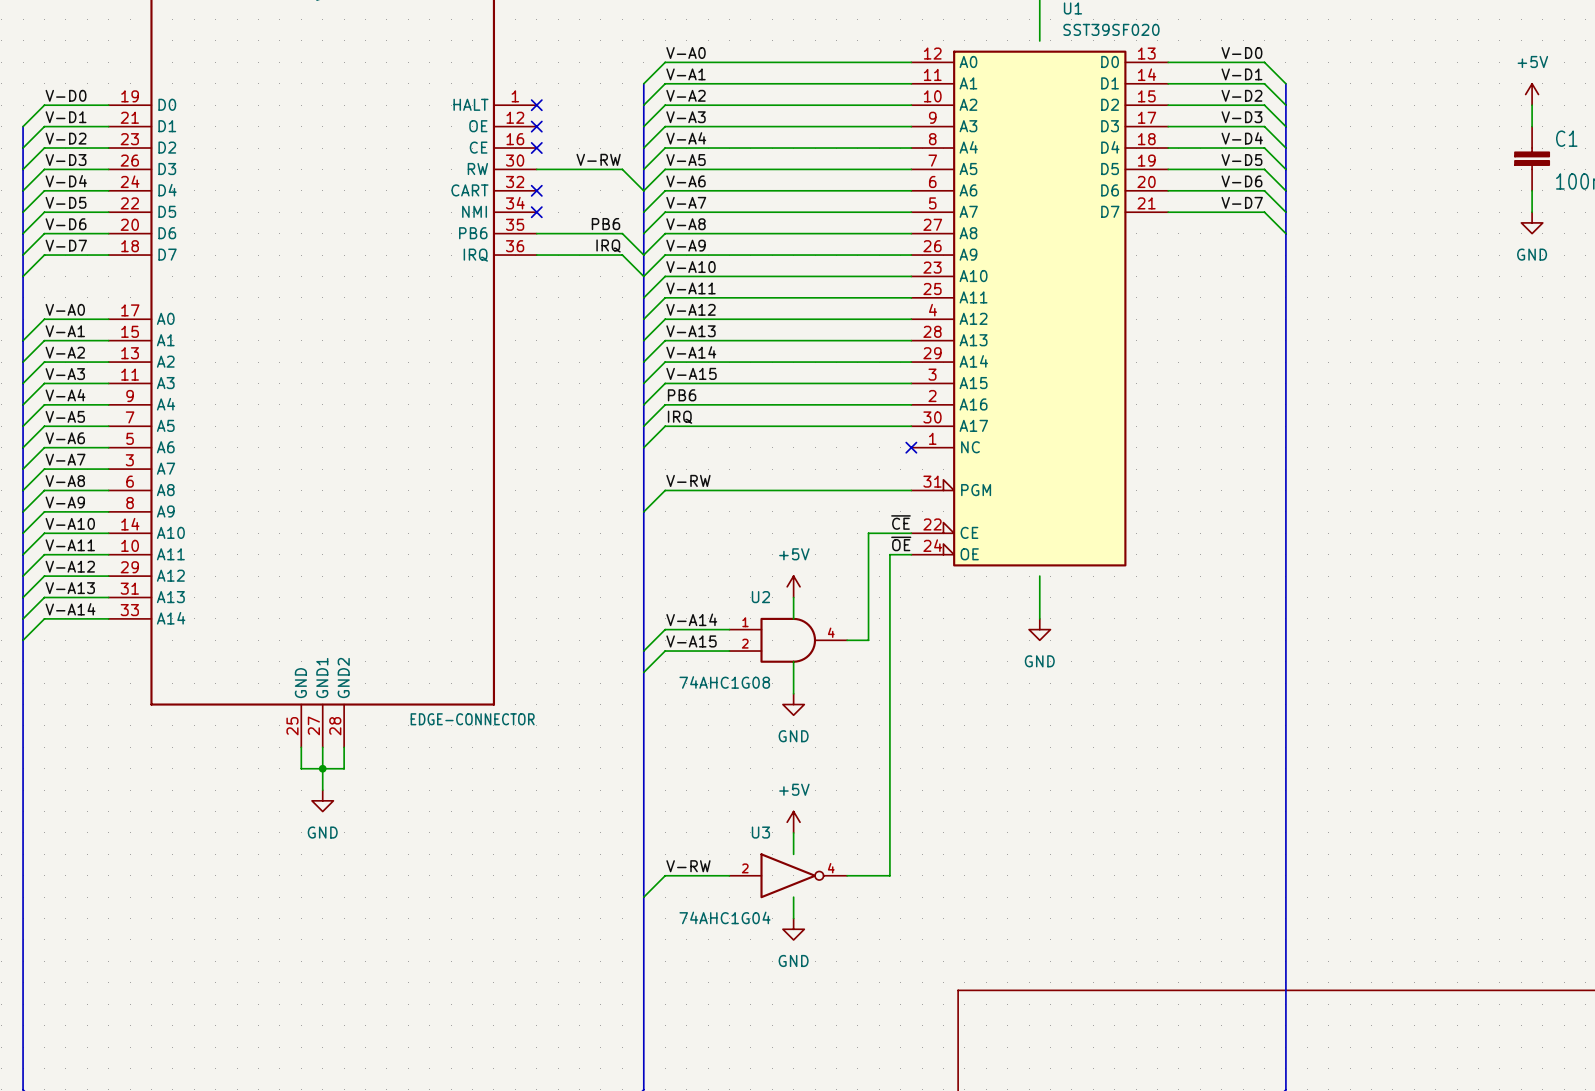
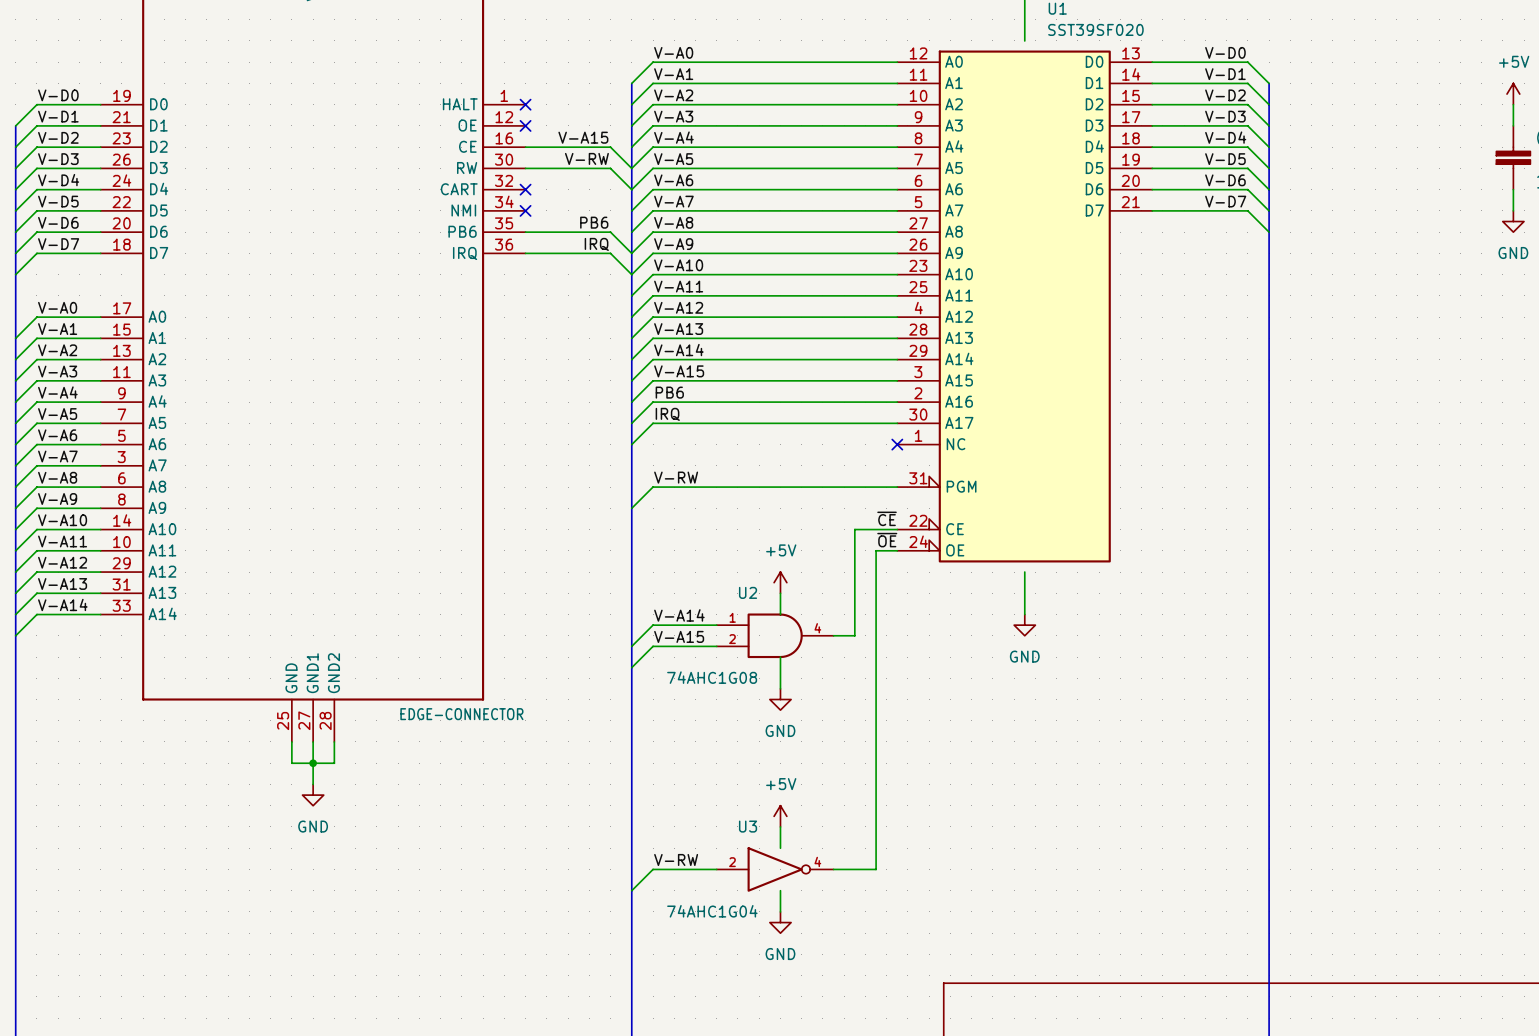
label: none -> V-A15 (583, 137)
wire: none -> (525, 147) (610, 147) (631, 168)
no-connect mark: (536, 148) -> none

